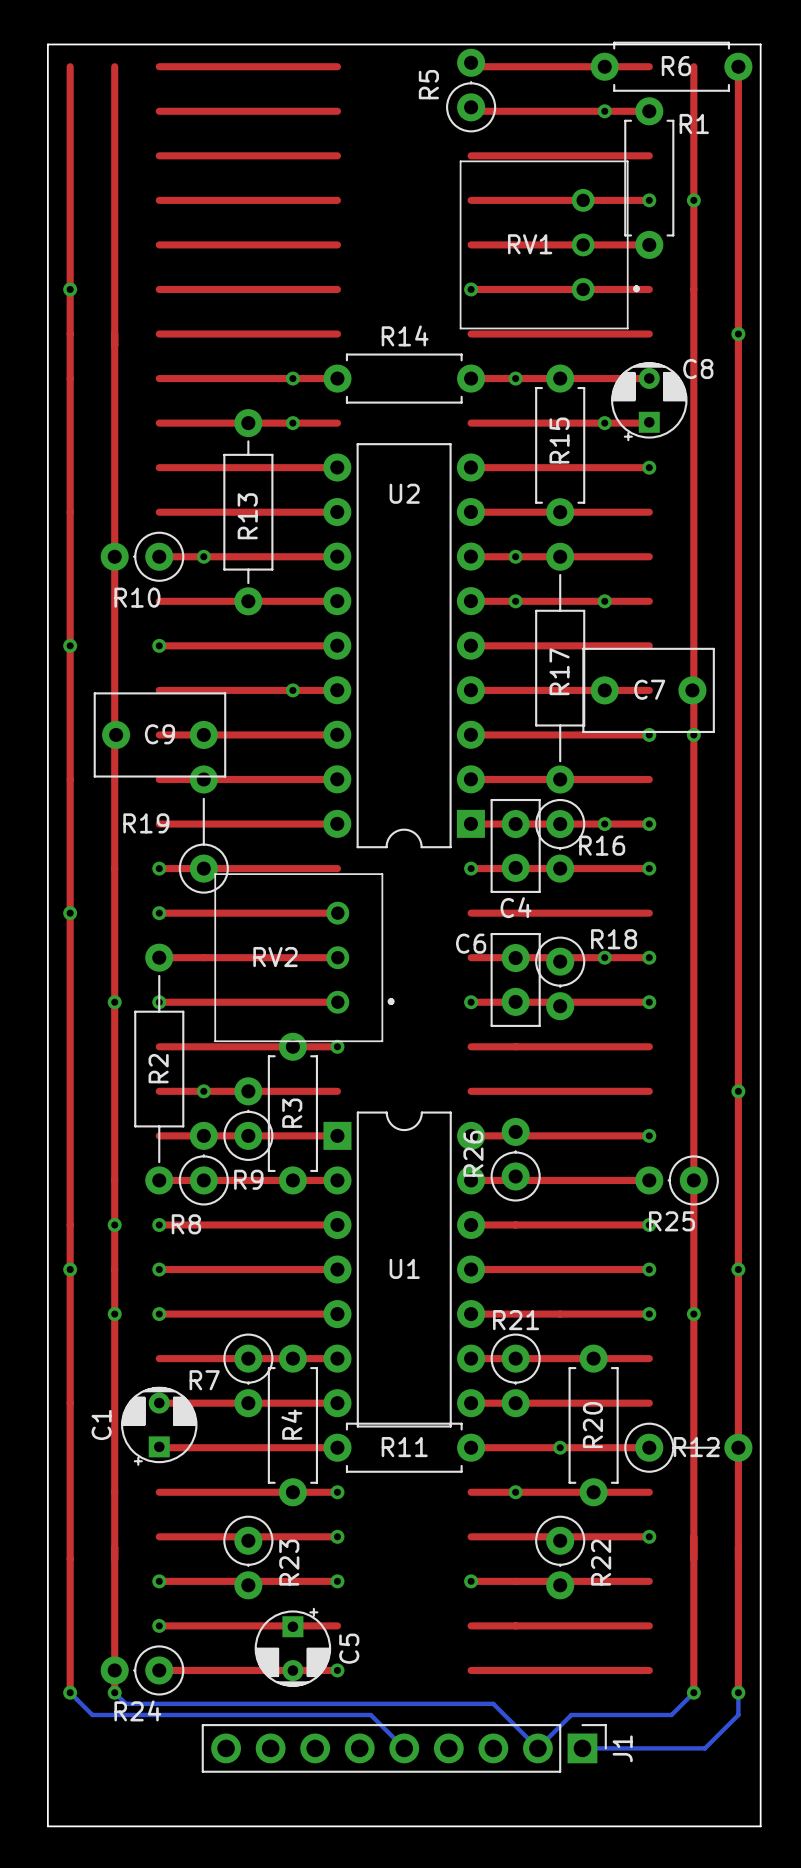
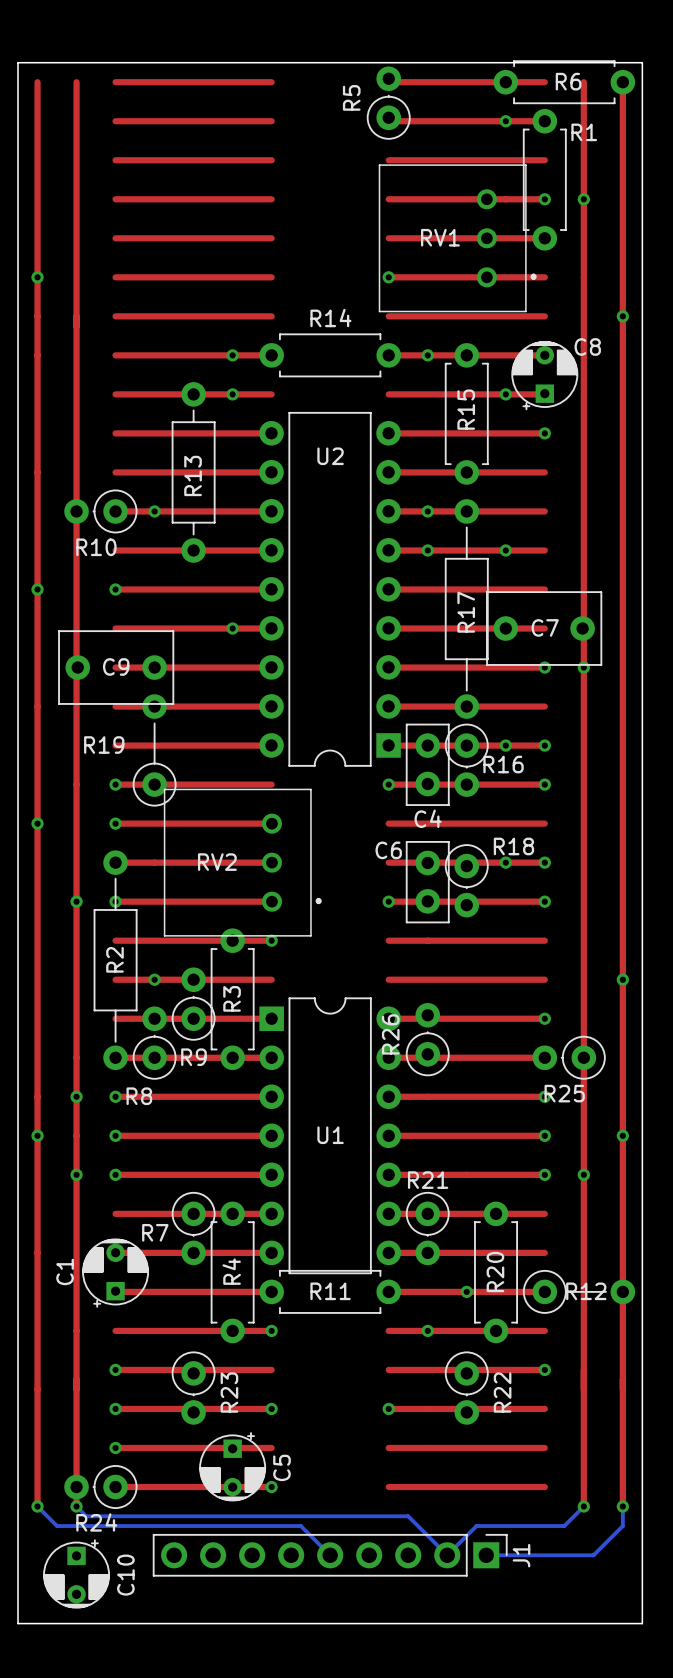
via: none -> (115, 1369)
via: (337, 1536) -> none
C10: none -> (76, 1573)

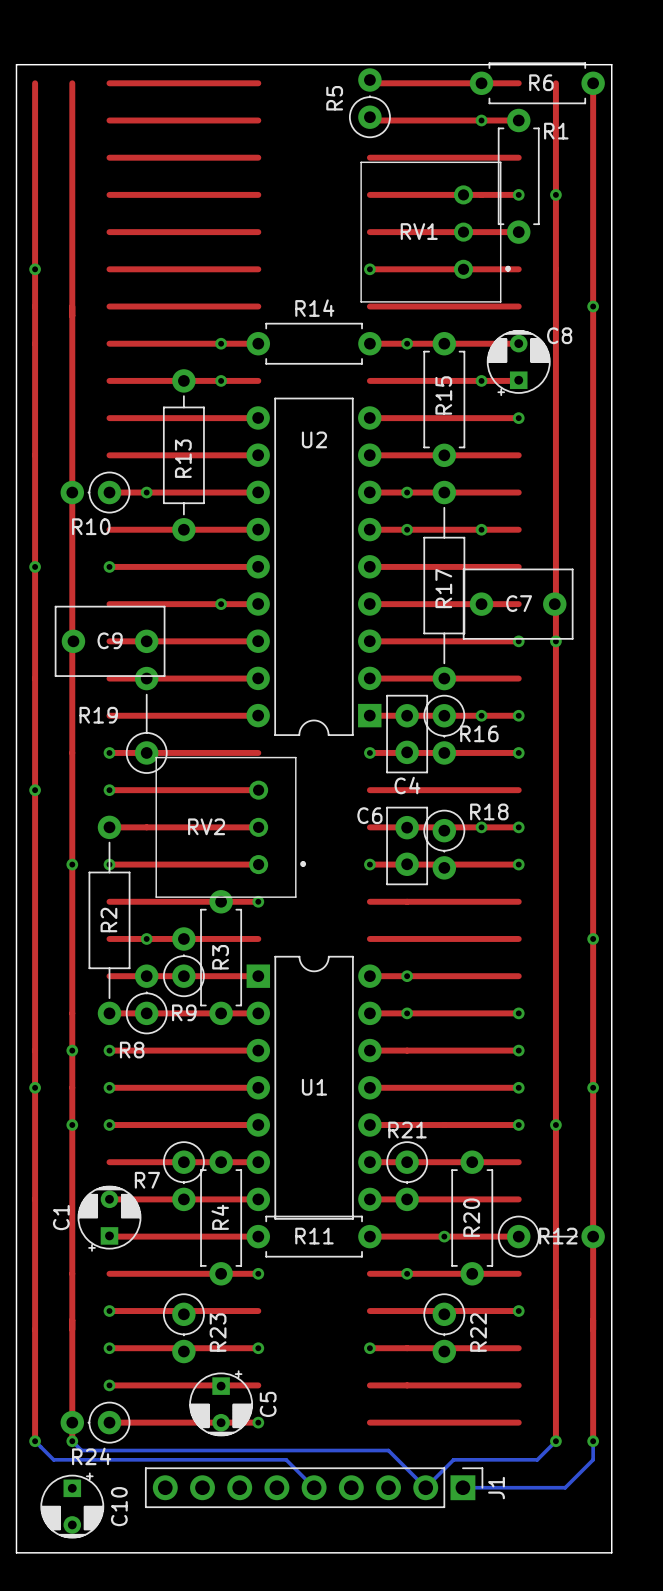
via: none -> (407, 976)
via position: (544, 1018) -> (518, 1013)
R26: (427, 1039) -> none
via: none -> (407, 1013)
R25: (569, 1057) -> none

